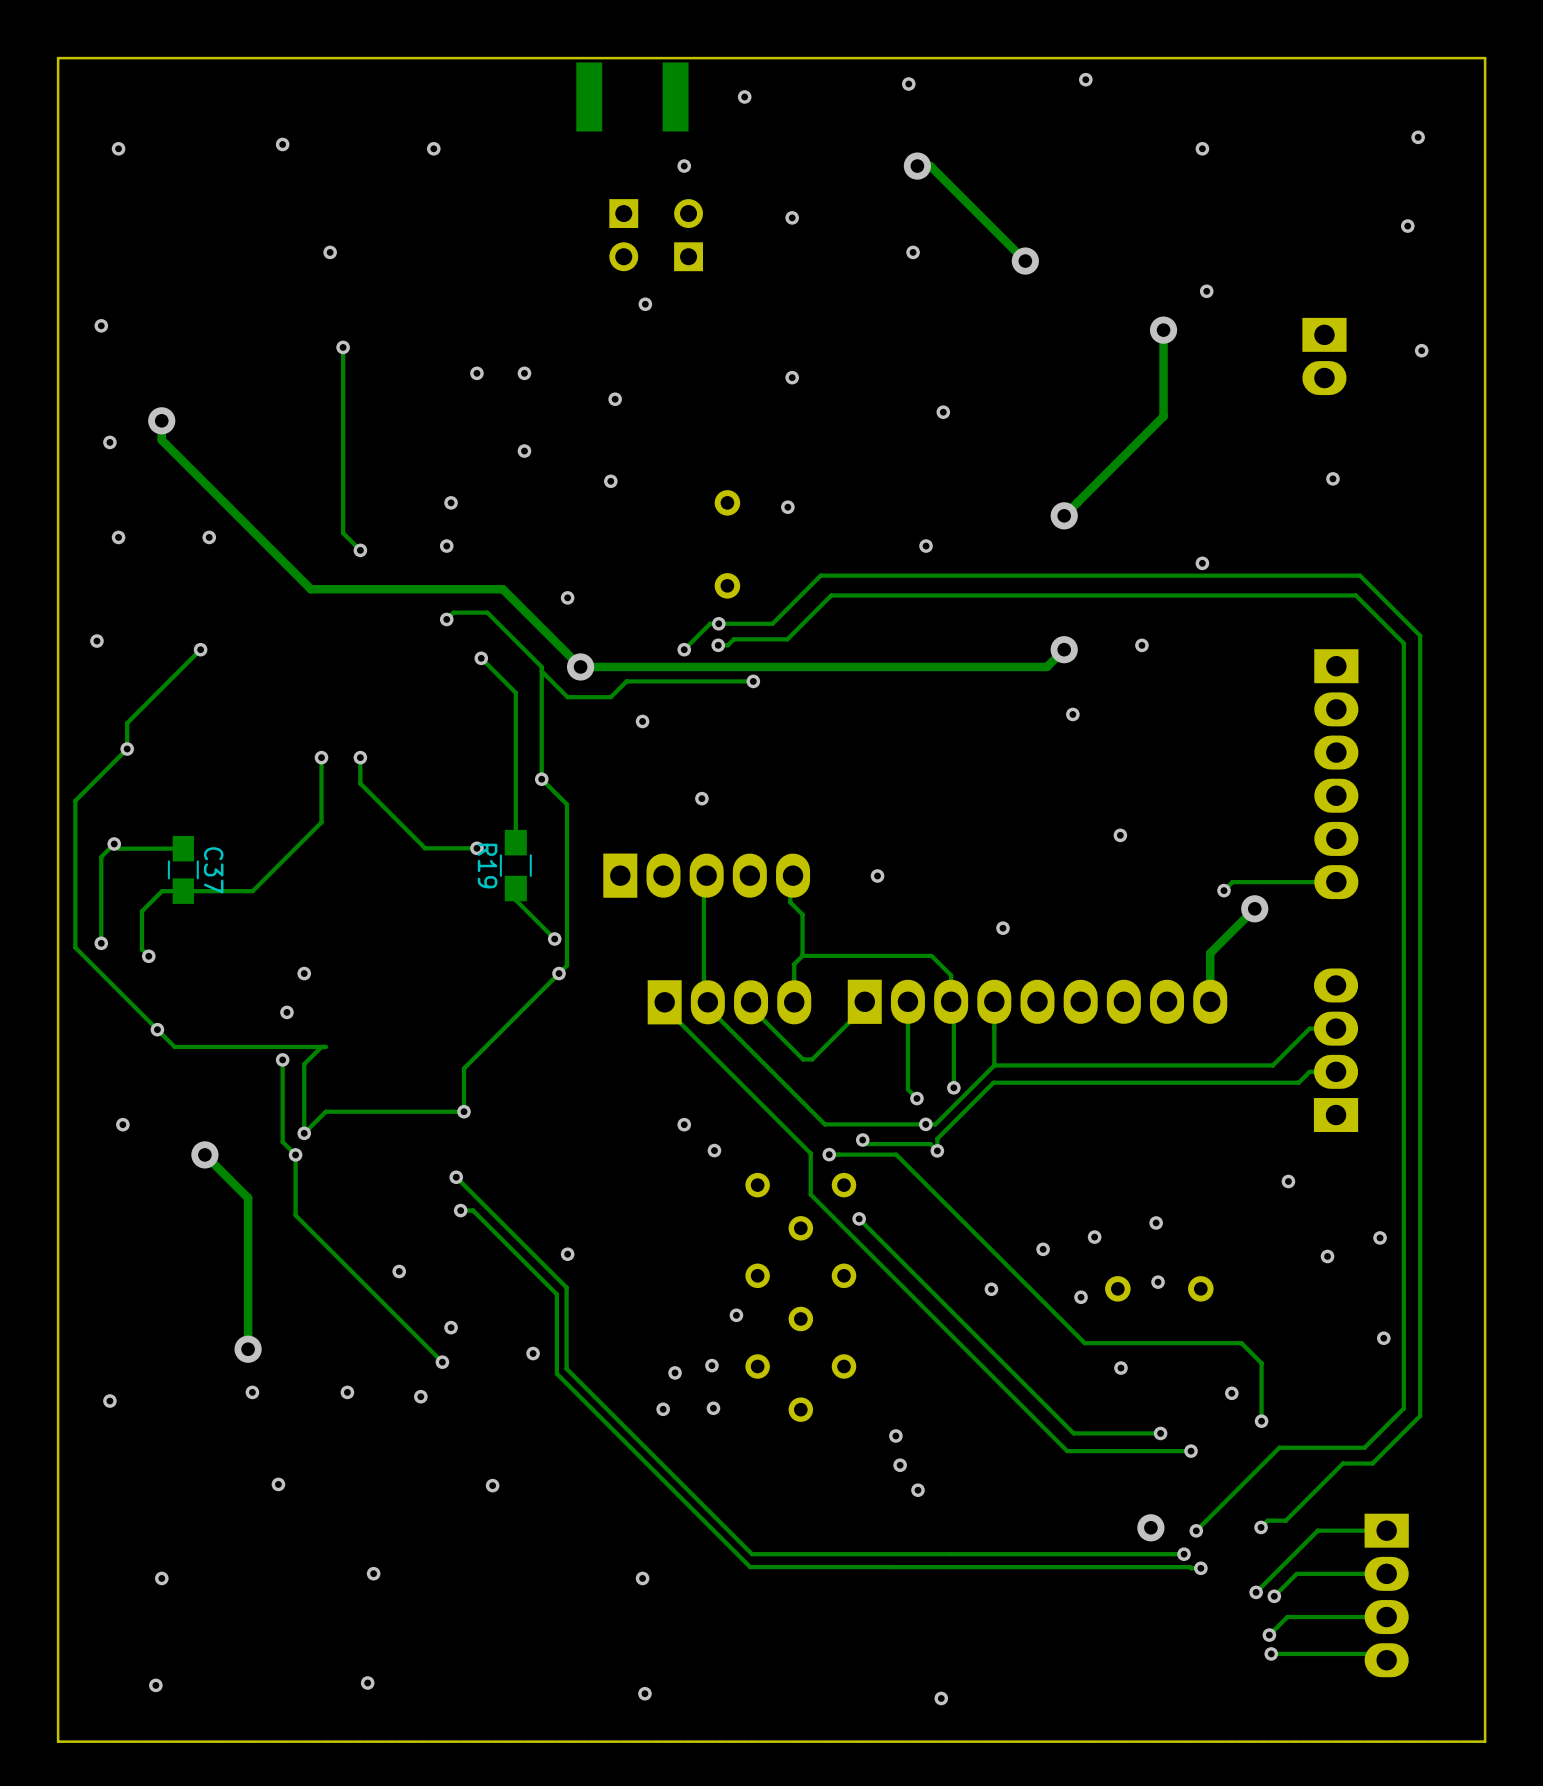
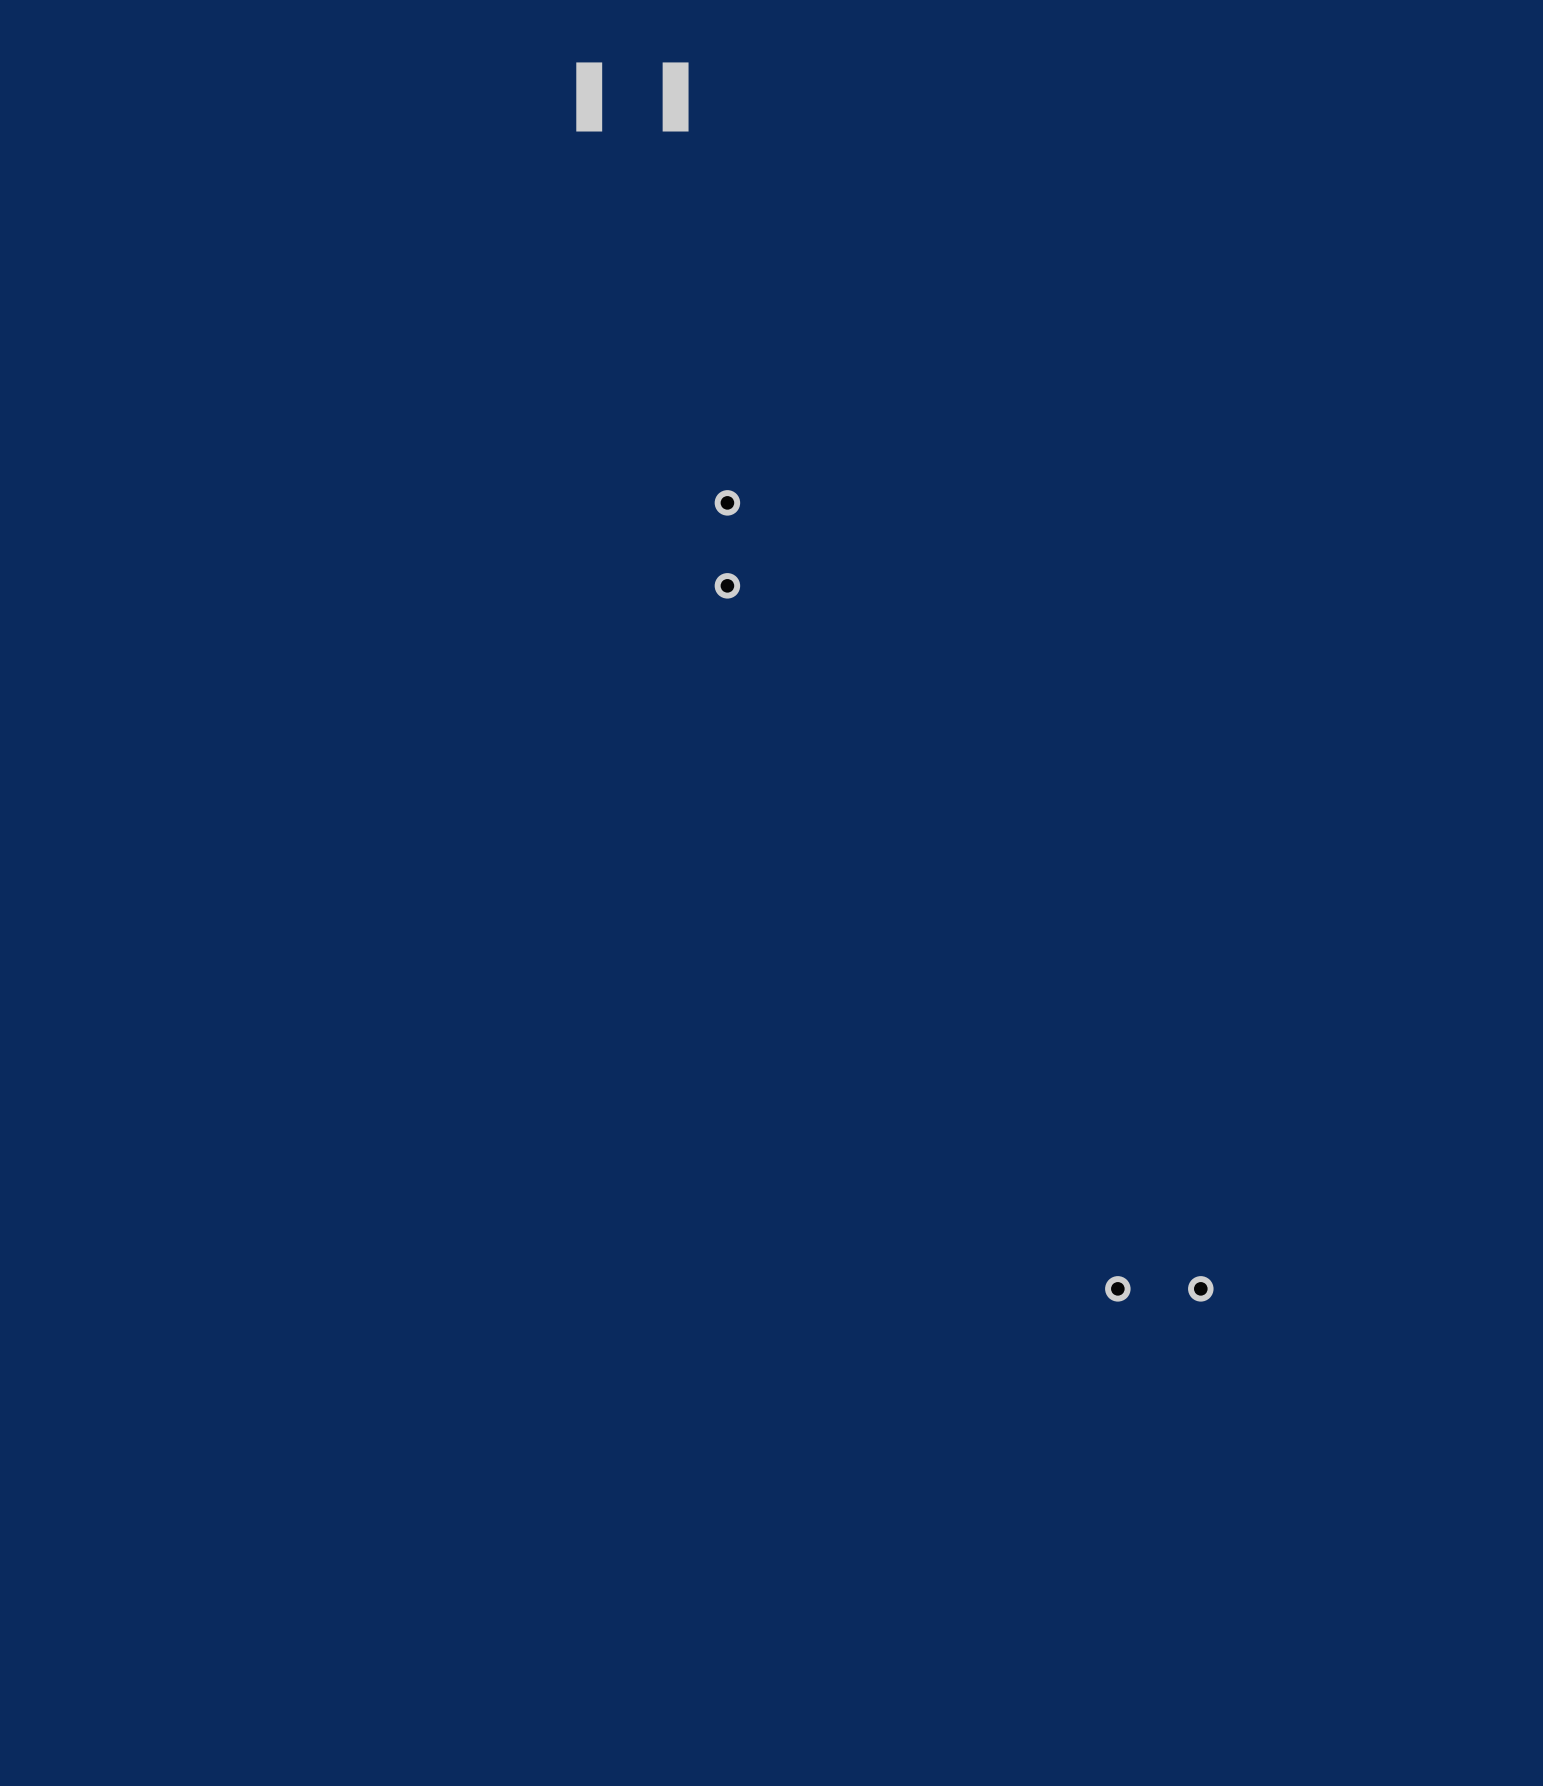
board edge: (1485, 58) (1485, 1741) (58, 1741) (58, 58) (1485, 58) -> none
via: (1085, 79) -> none
via: (908, 84) -> none
via: (744, 96) -> none
via: (1418, 137) -> none
via: (282, 144) -> none
via: (118, 148) -> none
via: (433, 148) -> none
via: (1202, 148) -> none
via: (684, 166) -> none
track: (917, 166) (930, 166) (1025, 261) -> none
via: (917, 166) -> none
via: (792, 217) -> none
via: (1407, 226) -> none
part: (623, 235) -> none
part: (688, 235) -> none
via: (330, 252) -> none
via: (913, 252) -> none
via: (1025, 261) -> none
via: (1206, 291) -> none
via: (645, 304) -> none
via: (101, 325) -> none
track: (1163, 330) (1163, 416) (1064, 515) -> none
via: (1163, 330) -> none
track: (343, 347) (343, 533) (360, 550) -> none
via: (343, 347) -> none
via: (1421, 350) -> none
part: (1324, 356) -> none
via: (476, 373) -> none
via: (524, 373) -> none
via: (792, 377) -> none
via: (615, 399) -> none
via: (943, 412) -> none
track: (161, 420) (161, 440) (310, 589) (502, 589) (580, 666) (1046, 666) (1064, 649) -> none
via: (161, 420) -> none
via: (109, 442) -> none
via: (524, 451) -> none
via: (1332, 478) -> none
via: (610, 481) -> none
via: (451, 502) -> none
via: (787, 507) -> none
via: (1064, 515) -> none
via: (118, 537) -> none
via: (209, 537) -> none
via: (446, 546) -> none
via: (926, 546) -> none
via: (360, 550) -> none
via: (1202, 563) -> none
via: (567, 597) -> none
track: (446, 619) (453, 612) (487, 612) (541, 666) (541, 779) (567, 804) (567, 965) (464, 1068) (464, 1111) (325, 1111) (304, 1133) (304, 1064) (321, 1046) -> none
via: (446, 619) -> none
via: (718, 623) -> none
via: (96, 641) -> none
track: (718, 645) (727, 645) (733, 639) (787, 639) (831, 595) (1355, 595) (1403, 643) (1403, 1408) (1364, 1447) (1279, 1447) (1196, 1530) -> none
via: (718, 645) -> none
via: (1141, 645) -> none
track: (200, 649) (127, 723) (127, 749) (75, 800) (75, 947) (174, 1046) (325, 1046) -> none
via: (200, 649) -> none
track: (684, 649) (710, 623) (772, 623) (820, 575) (1360, 575) (1420, 635) (1420, 1415) (1372, 1463) (1342, 1463) (1285, 1520) (1267, 1520) (1261, 1527) -> none
via: (684, 649) -> none
via: (1064, 649) -> none
track: (481, 658) (515, 692) (515, 842) -> none
via: (481, 658) -> none
via: (580, 666) -> none
track: (541, 671) (567, 697) (610, 697) (626, 681) (753, 681) -> none
via: (753, 681) -> none
via: (1072, 714) -> none
via: (642, 721) -> none
via: (127, 749) -> none
track: (321, 757) (321, 822) (252, 891) (162, 891) (141, 911) (141, 949) (148, 956) -> none
via: (321, 757) -> none
track: (360, 757) (360, 783) (425, 848) (476, 848) -> none
via: (360, 757) -> none
part: (1336, 774) -> none
via: (541, 779) -> none
via: (701, 798) -> none
via: (1120, 835) -> none
via: (114, 844) -> none
track: (183, 848) (118, 848) (114, 844) (101, 856) (101, 943) -> none
via: (476, 848) -> none
R19: (515, 865) -> none
C37: (183, 869) -> none
track: (703, 875) (703, 998) (707, 1002) (707, 1007) (824, 1124) (935, 1124) (994, 1065) -> none
part: (706, 875) -> none
track: (790, 875) (790, 902) (802, 914) (802, 955) -> none
via: (877, 875) -> none
track: (1336, 882) (1232, 882) (1223, 890) -> none
track: (515, 888) (515, 900) (554, 939) -> none
via: (1223, 890) -> none
track: (1254, 908) (1210, 953) (1210, 1001) -> none
via: (1254, 908) -> none
via: (1002, 928) -> none
via: (554, 939) -> none
via: (101, 943) -> none
track: (802, 955) (794, 964) (794, 1002) -> none
track: (802, 955) (931, 955) (951, 975) (951, 1001) (953, 1004) (953, 1087) -> none
via: (148, 956) -> none
via: (304, 973) -> none
via: (559, 973) -> none
track: (864, 1001) (864, 1006) (812, 1059) (803, 1059) (751, 1007) (751, 1002) -> none
track: (907, 1001) (907, 1089) (916, 1098) -> none
track: (994, 1001) (994, 1065) -> none
part: (1037, 1001) -> none
track: (664, 1002) (664, 1007) (810, 1153) (810, 1194) (1067, 1451) (1191, 1451) -> none
part: (729, 1002) -> none
via: (286, 1012) -> none
track: (1336, 1028) (1309, 1028) (1272, 1065) (994, 1065) -> none
via: (157, 1029) -> none
part: (1336, 1050) -> none
track: (282, 1059) (282, 1141) (295, 1154) (295, 1215) (442, 1362) -> none
via: (282, 1059) -> none
track: (1336, 1071) (1309, 1071) (1298, 1082) (993, 1082) (937, 1138) (937, 1150) (930, 1144) (866, 1144) (862, 1140) -> none
via: (953, 1087) -> none
via: (916, 1098) -> none
via: (464, 1111) -> none
via: (122, 1124) -> none
via: (684, 1124) -> none
via: (925, 1124) -> none
via: (304, 1133) -> none
via: (862, 1140) -> none
via: (714, 1150) -> none
via: (937, 1150) -> none
track: (204, 1154) (248, 1198) (248, 1349) -> none
via: (204, 1154) -> none
via: (295, 1154) -> none
track: (829, 1154) (896, 1154) (1084, 1343) (1241, 1343) (1261, 1363) (1261, 1421) -> none
via: (829, 1154) -> none
track: (456, 1177) (566, 1287) (566, 1368) (751, 1554) (1184, 1554) -> none
via: (456, 1177) -> none
via: (1288, 1181) -> none
part: (800, 1206) -> none
track: (460, 1210) (473, 1210) (556, 1294) (556, 1373) (750, 1567) (1200, 1568) -> none
via: (460, 1210) -> none
track: (859, 1218) (1073, 1433) (1160, 1433) -> none
via: (859, 1218) -> none
via: (1156, 1222) -> none
via: (1094, 1237) -> none
via: (1380, 1237) -> none
via: (1043, 1249) -> none
via: (567, 1254) -> none
via: (1327, 1256) -> none
via: (399, 1271) -> none
via: (1158, 1282) -> none
via: (991, 1289) -> none
part: (800, 1297) -> none
via: (1081, 1297) -> none
via: (736, 1315) -> none
via: (451, 1327) -> none
via: (1383, 1338) -> none
via: (248, 1349) -> none
via: (533, 1353) -> none
via: (442, 1362) -> none
via: (711, 1365) -> none
via: (1120, 1368) -> none
via: (675, 1372) -> none
part: (800, 1388) -> none
via: (252, 1392) -> none
via: (347, 1392) -> none
via: (1231, 1393) -> none
via: (420, 1396) -> none
via: (109, 1401) -> none
via: (713, 1408) -> none
via: (663, 1409) -> none
via: (1261, 1421) -> none
via: (1160, 1433) -> none
via: (895, 1435) -> none
via: (1191, 1451) -> none
via: (900, 1465) -> none
via: (278, 1484) -> none
via: (492, 1485) -> none
via: (917, 1490) -> none
via: (1150, 1527) -> none
via: (1261, 1527) -> none
via: (1196, 1530) -> none
track: (1386, 1530) (1317, 1530) (1256, 1592) -> none
via: (1184, 1554) -> none
via: (1200, 1568) -> none
via: (373, 1573) -> none
track: (1386, 1573) (1296, 1573) (1274, 1596) -> none
via: (161, 1578) -> none
via: (642, 1578) -> none
via: (1256, 1592) -> none
part: (1386, 1595) -> none
via: (1274, 1596) -> none
track: (1386, 1617) (1287, 1617) (1269, 1635) -> none
via: (1269, 1635) -> none
track: (1271, 1653) (1380, 1653) (1386, 1660) -> none
via: (1271, 1653) -> none
via: (367, 1683) -> none
via: (155, 1685) -> none
via: (644, 1693) -> none
via: (941, 1698) -> none

